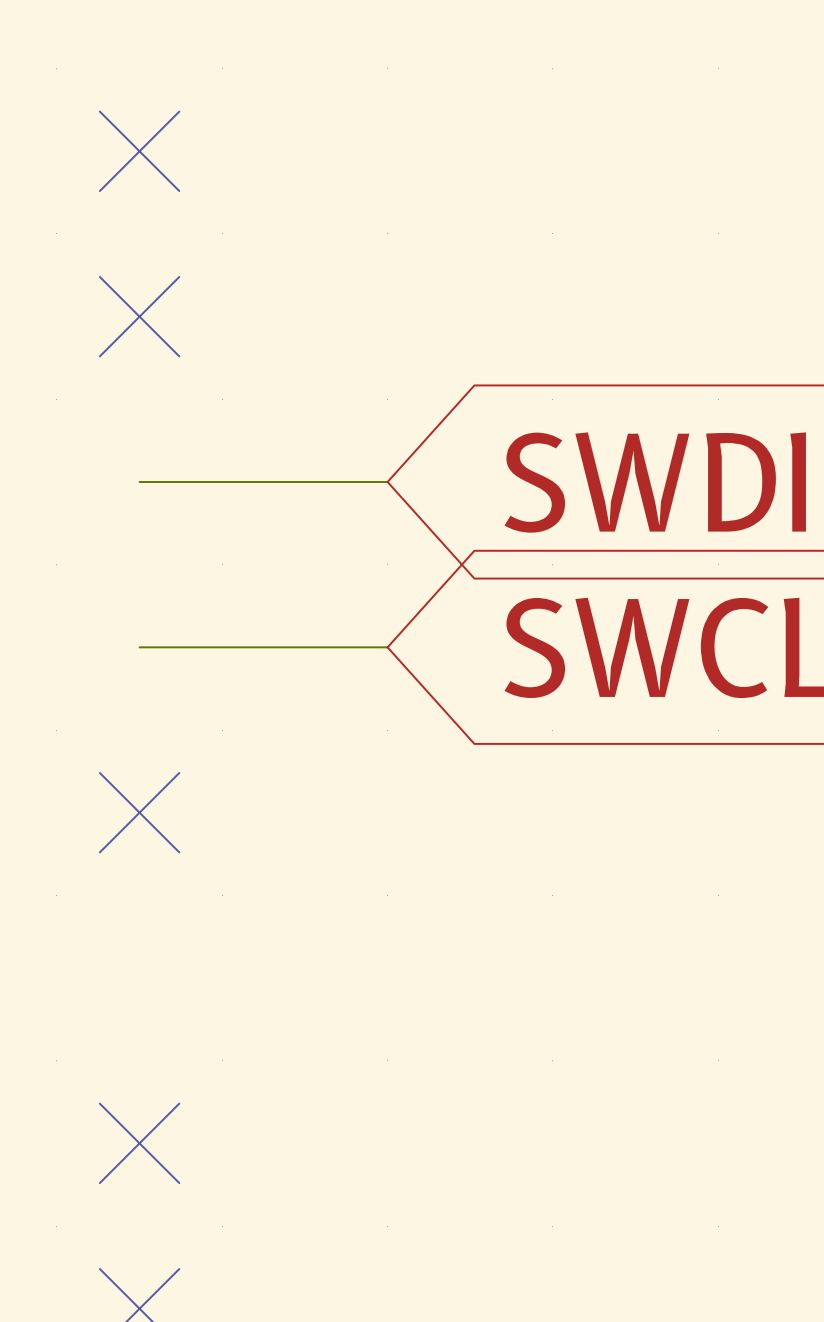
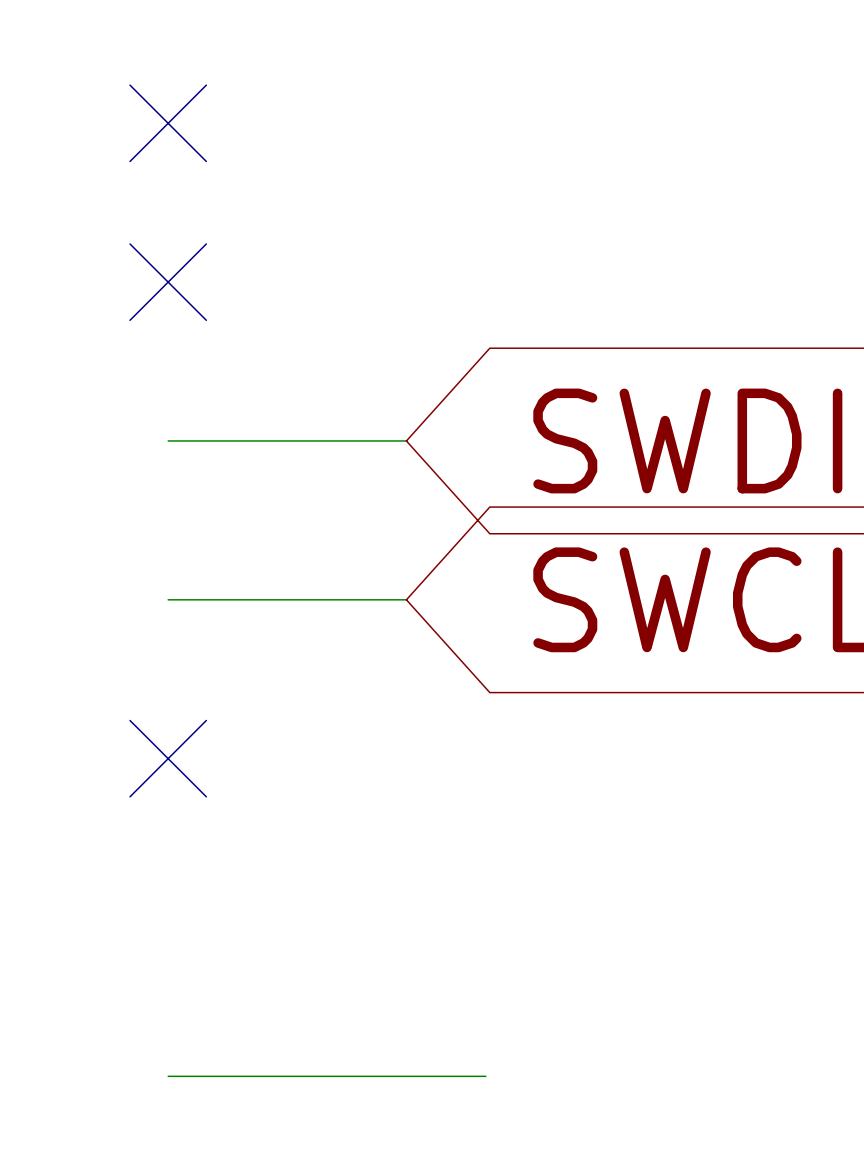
wire: none -> (168, 1076) (485, 1076)
no-connect mark: (139, 1143) -> none

